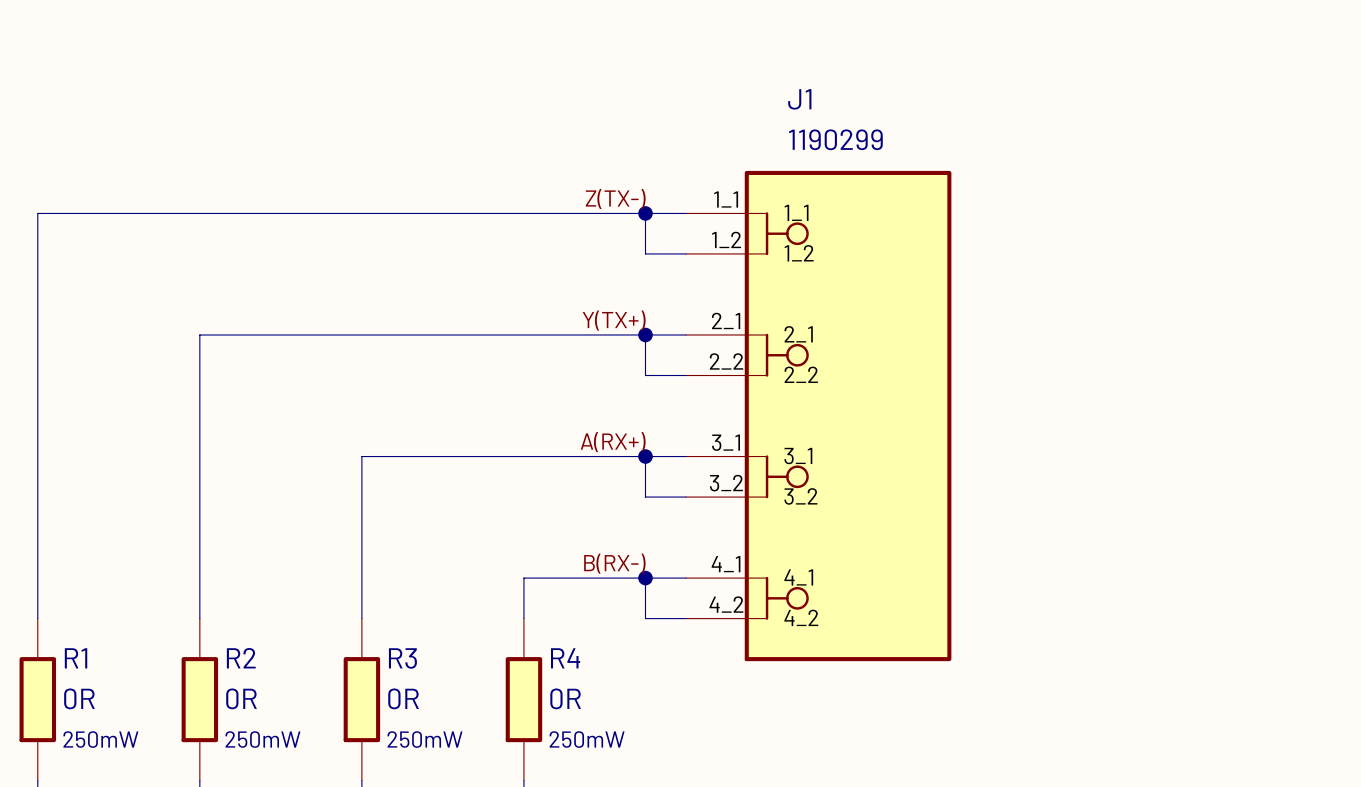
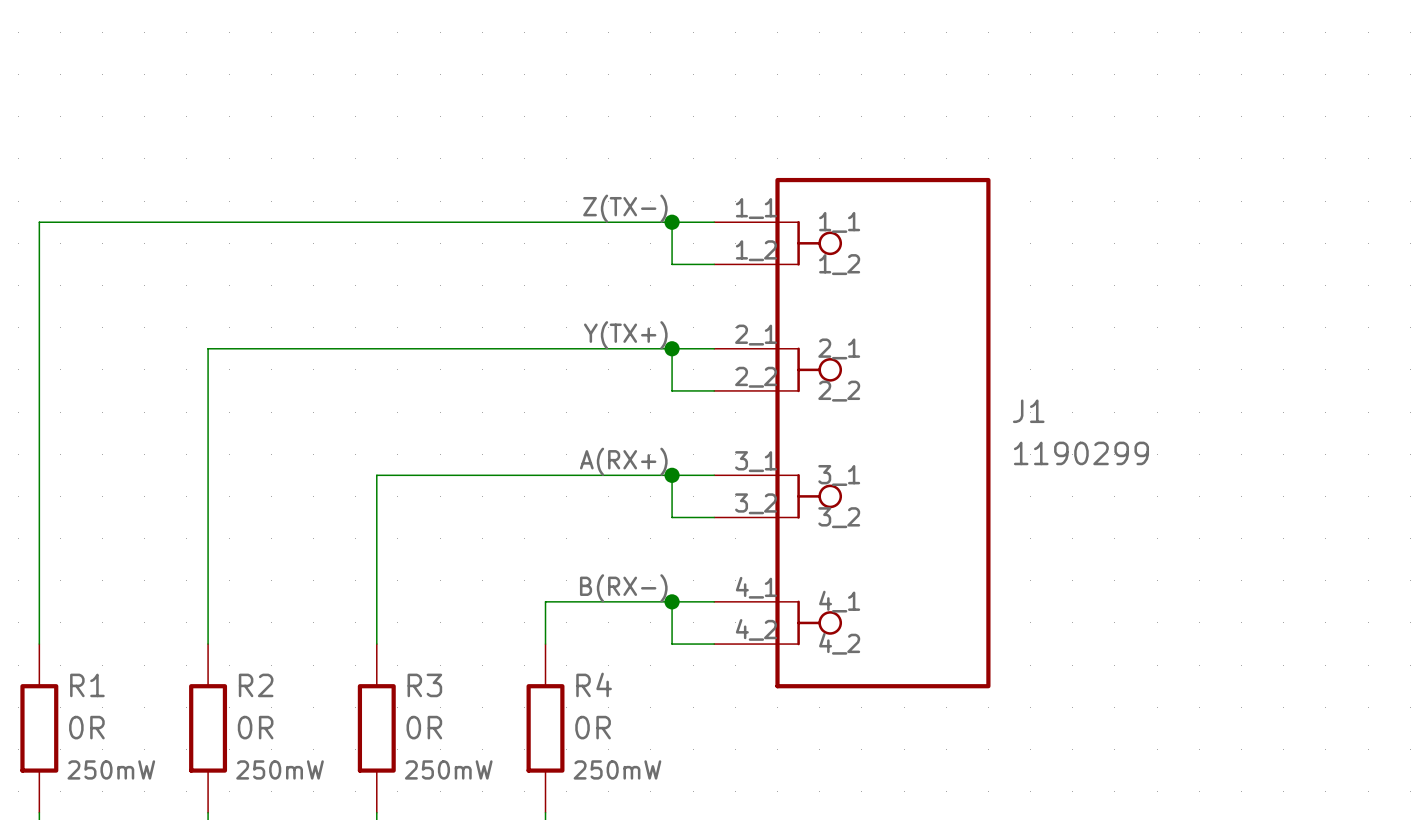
J1 name position: J1 (799, 99) -> J1 (1028, 411)
J1 value position: 1190299 (835, 139) -> 1190299 (1081, 453)

